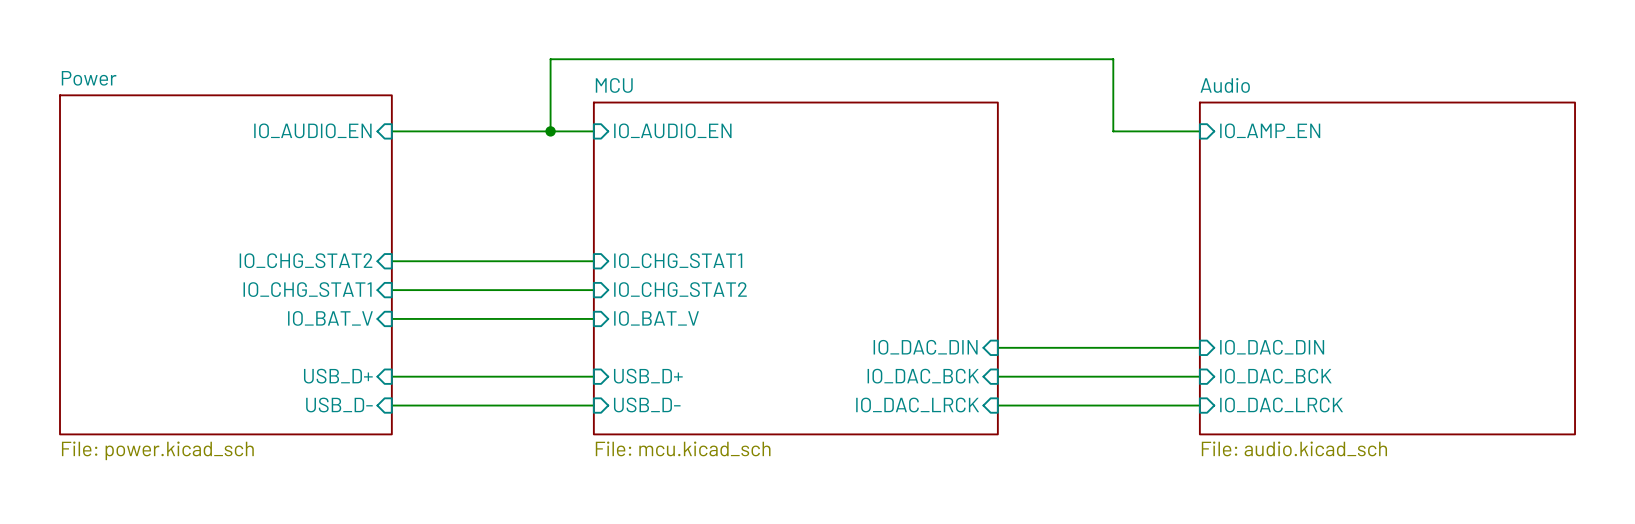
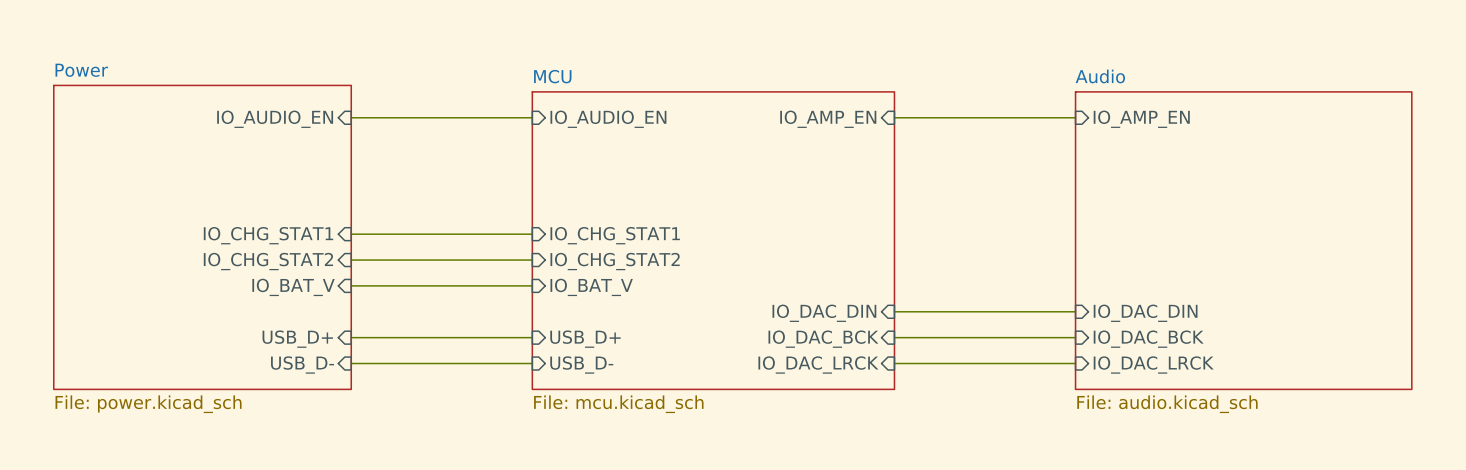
sheet pin: none -> IO_AMP_EN (828, 119)
wire: (550, 131) (550, 59) (1113, 59) (1113, 131) -> (894, 117) (997, 117)
junction: (550, 131) -> none
sheet pin: IO_CHG_STAT2 (306, 260) -> IO_CHG_STAT1 (268, 235)
sheet pin: IO_CHG_STAT1 (307, 289) -> IO_CHG_STAT2 (268, 261)

